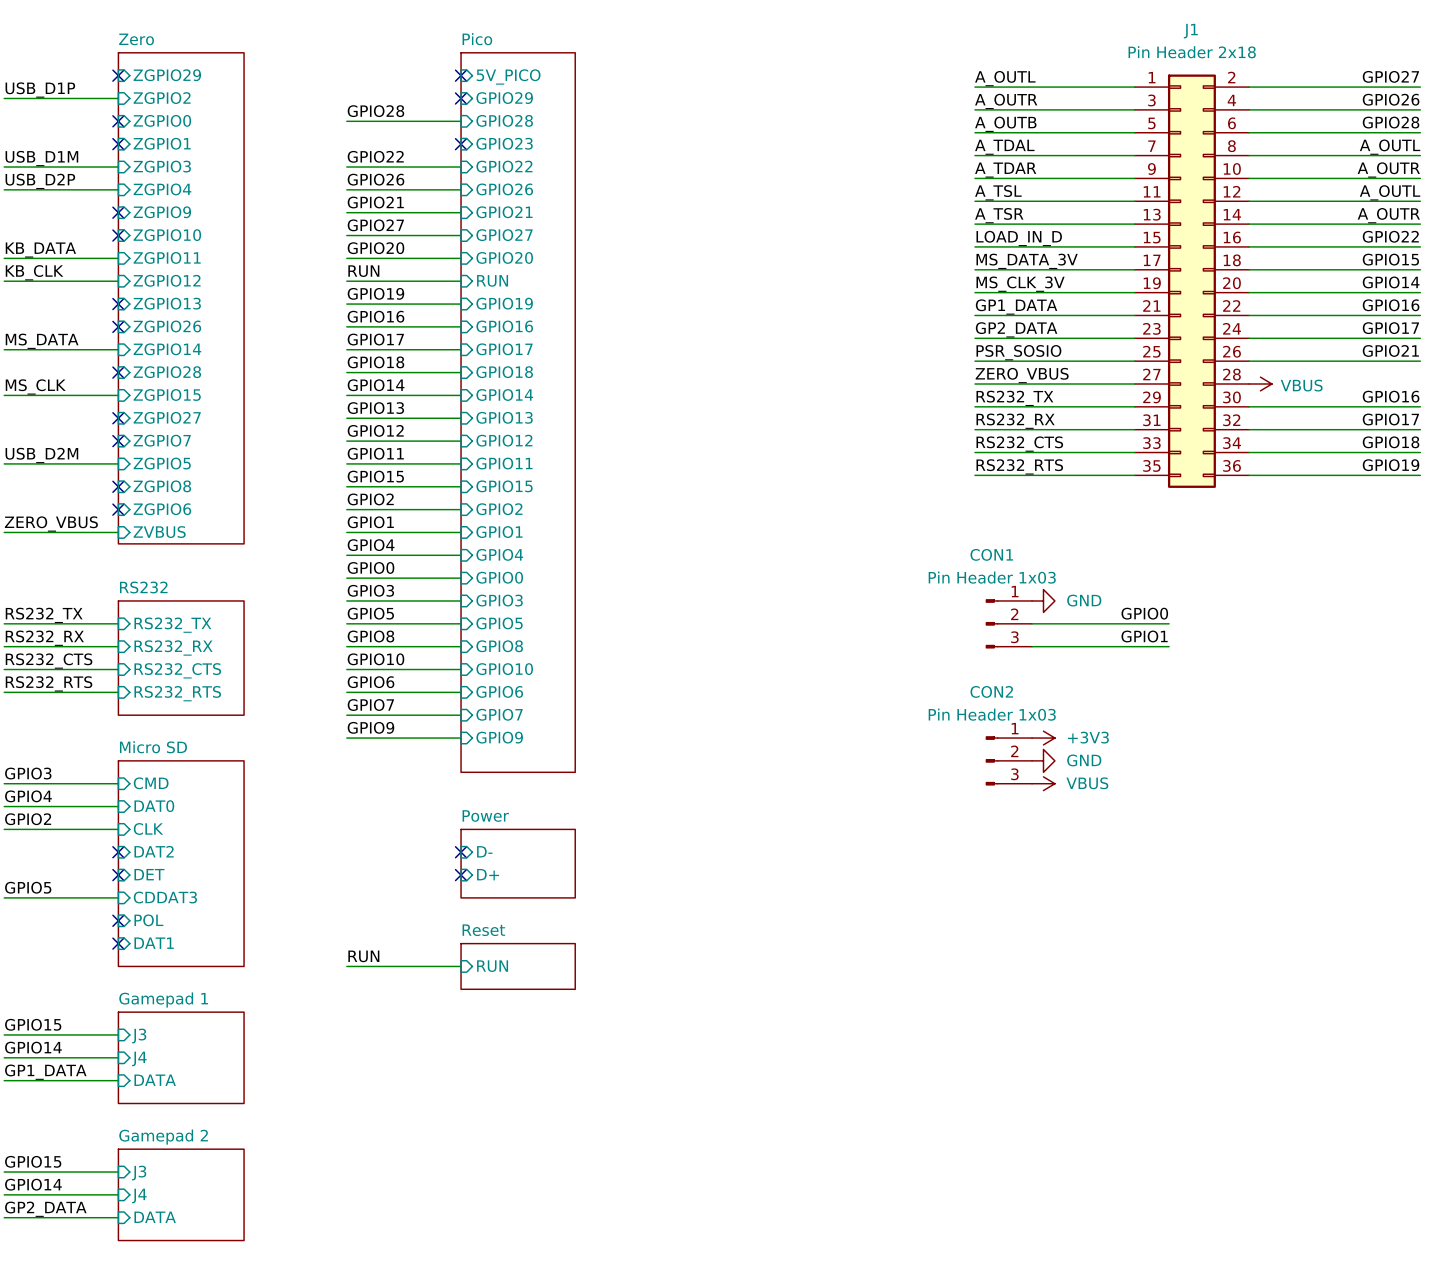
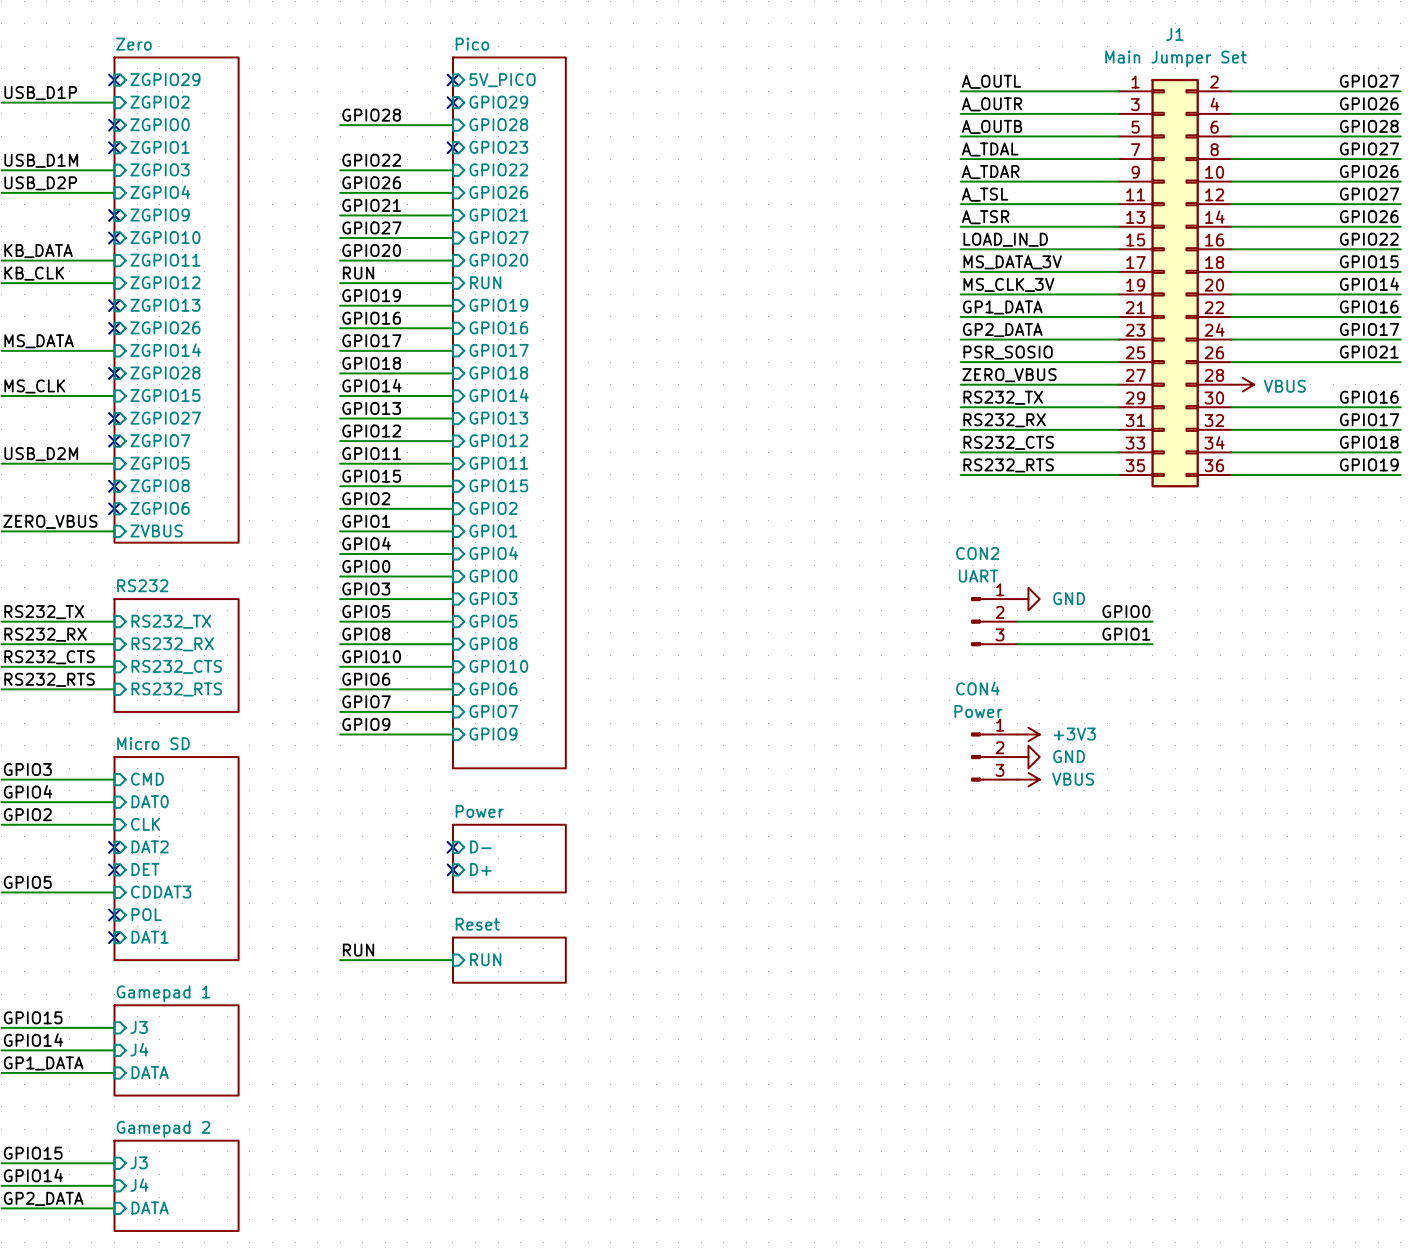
J1 value: Pin Header 2x18 (1192, 52) -> Main Jumper Set (1175, 58)
label: A_OUTL (1390, 147) -> GPIO27 (1369, 148)
label: A_OUTR (1388, 169) -> GPIO26 (1369, 171)
label: A_OUTL (1390, 192) -> GPIO27 (1369, 194)
label: A_OUTR (1388, 215) -> GPIO26 (1369, 216)
CON1 name: CON1 (991, 554) -> CON2 (977, 553)
CON1 value: Pin Header 1x03 (992, 577) -> UART (978, 576)
CON2 name: CON2 (991, 691) -> CON4 (977, 688)
CON2 value: Pin Header 1x03 (992, 714) -> Power (978, 711)

